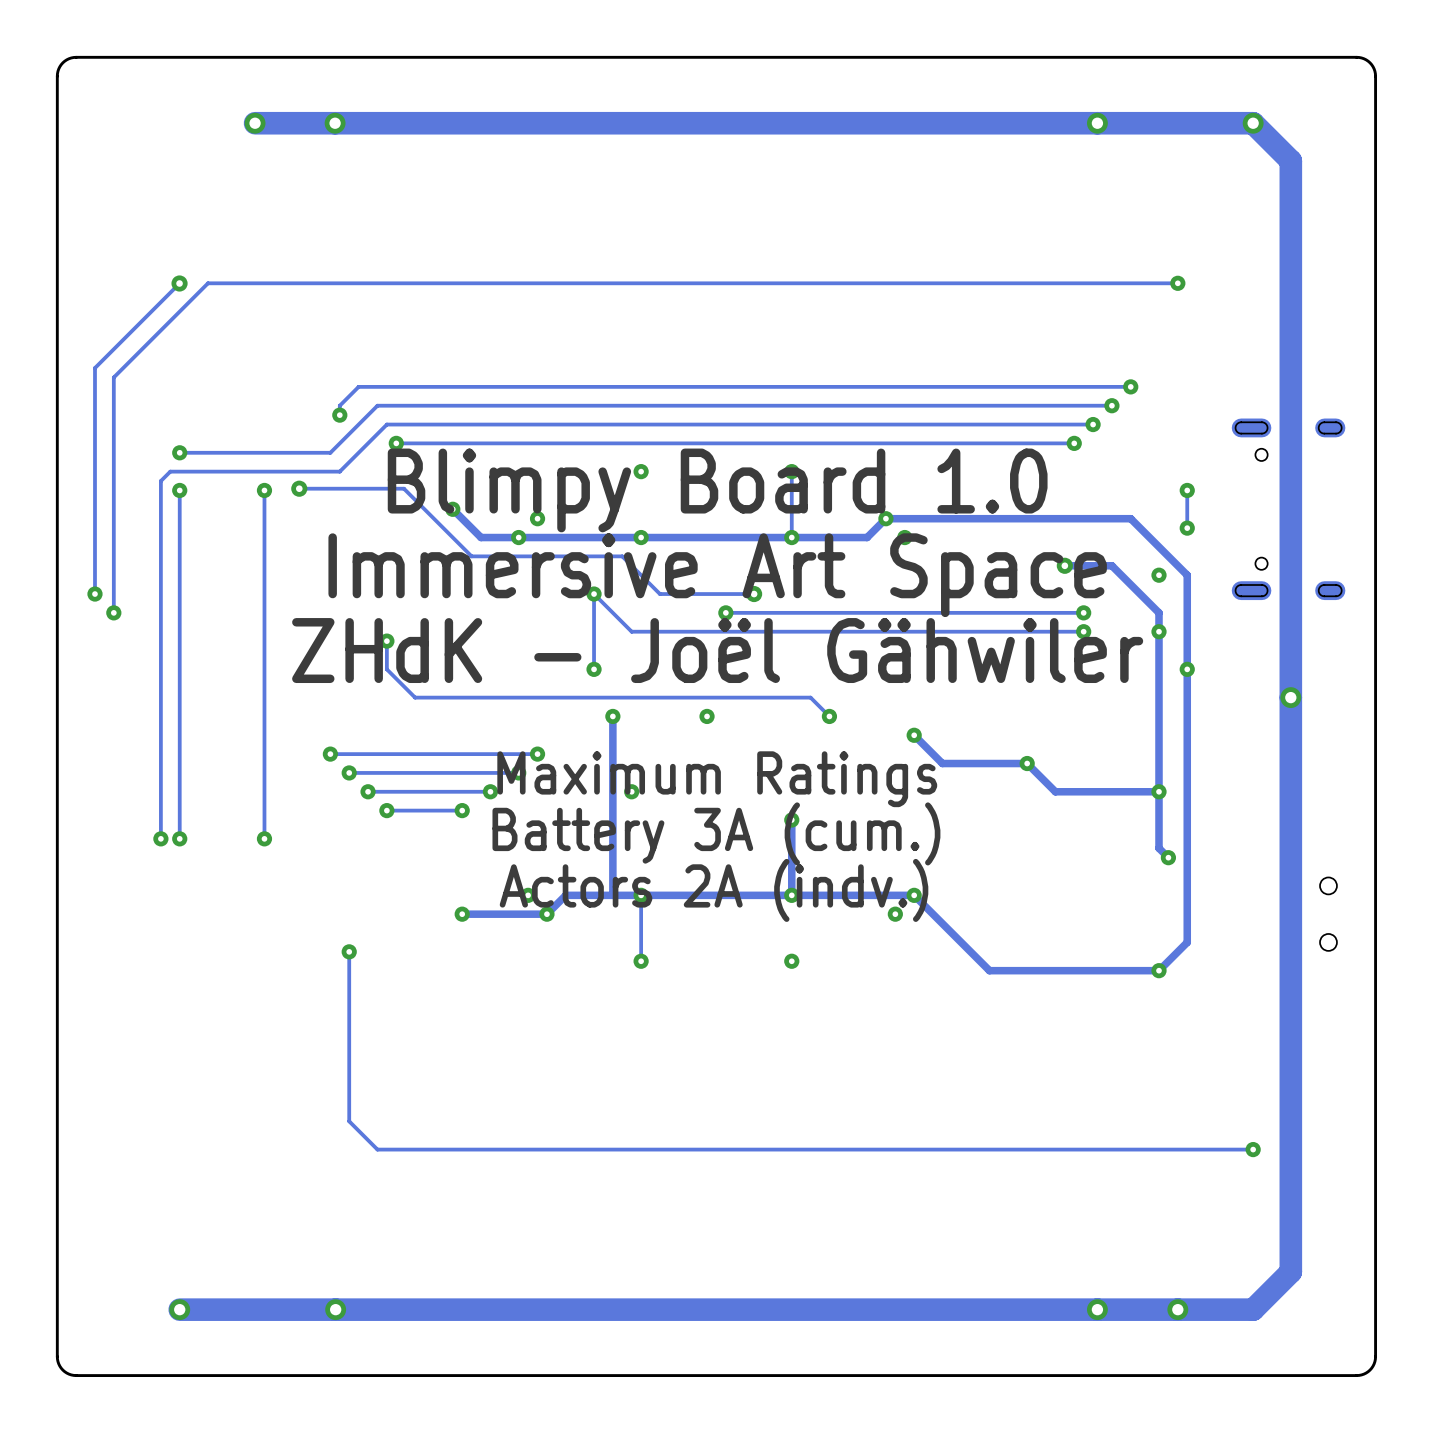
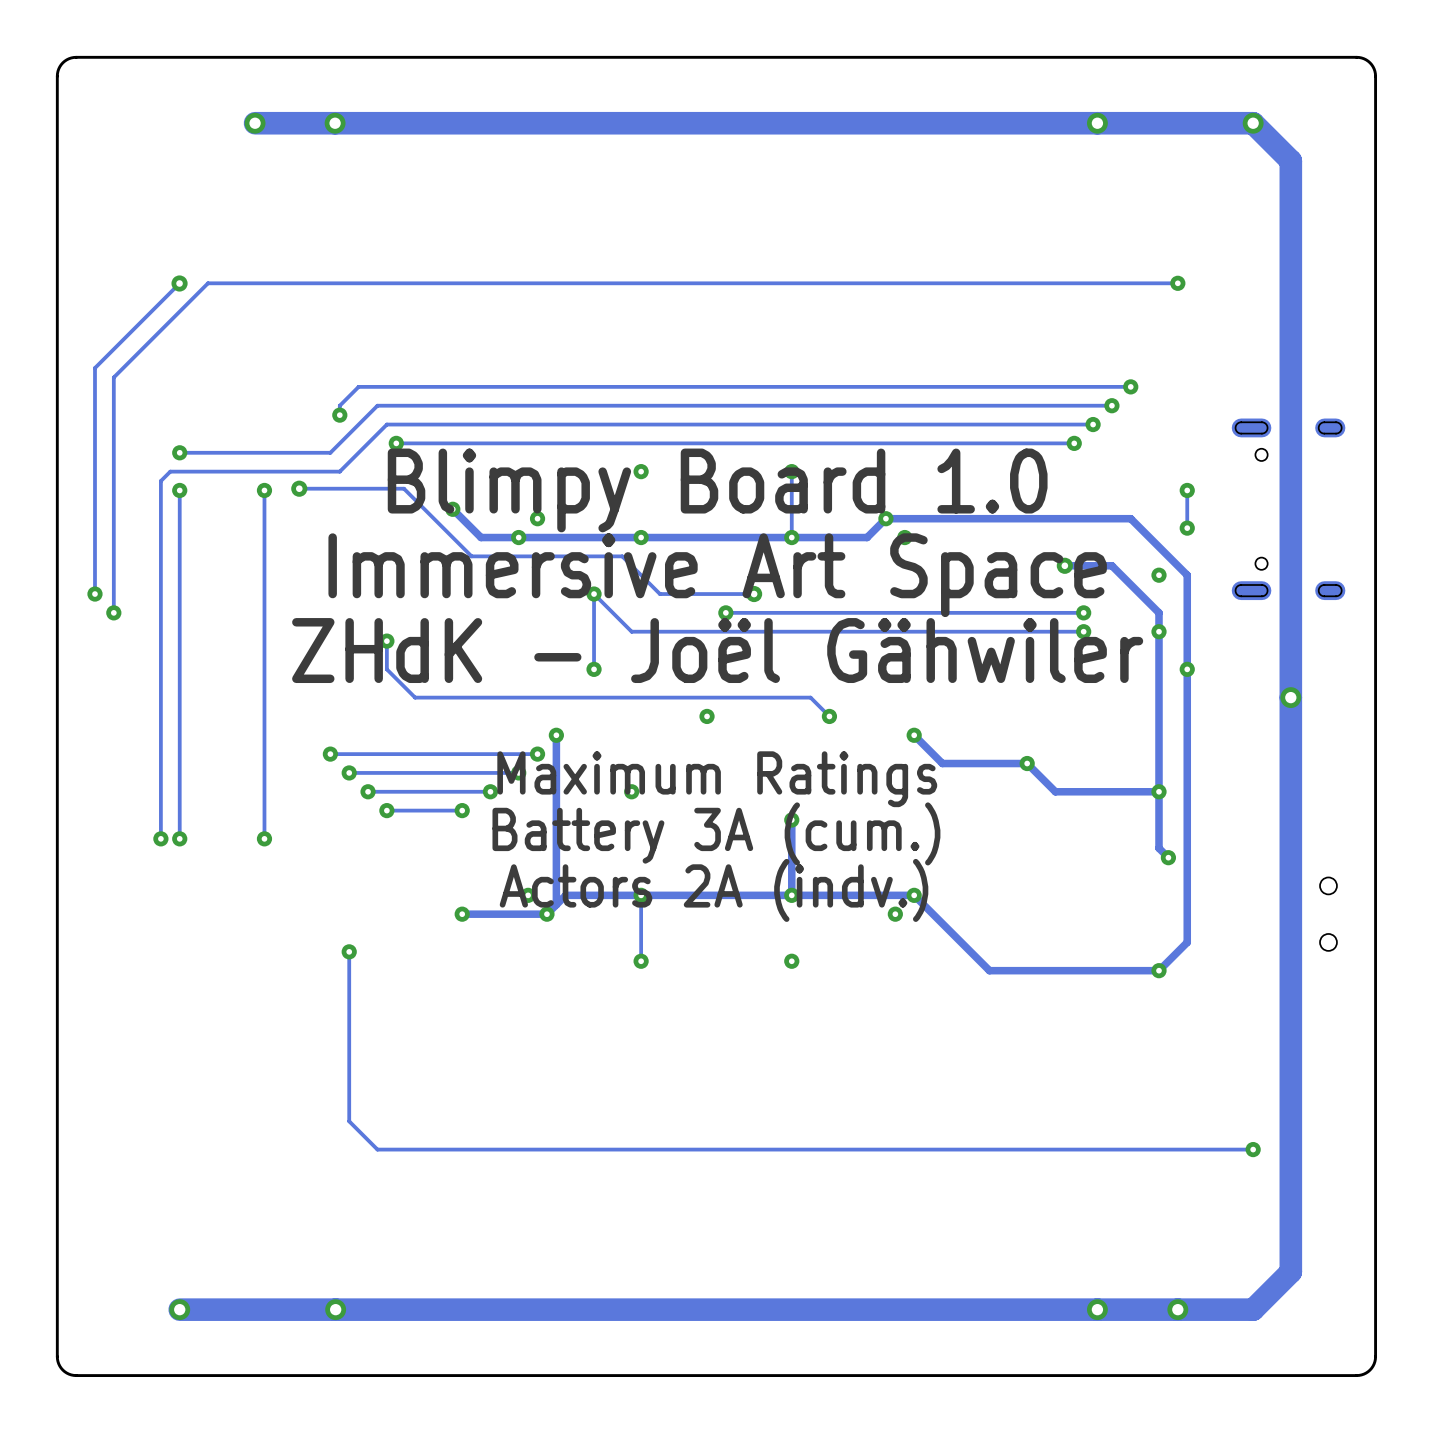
track: (612, 716) (612, 895) -> none
via position: (612, 716) -> (556, 735)
track: none -> (556, 735) (556, 904)

